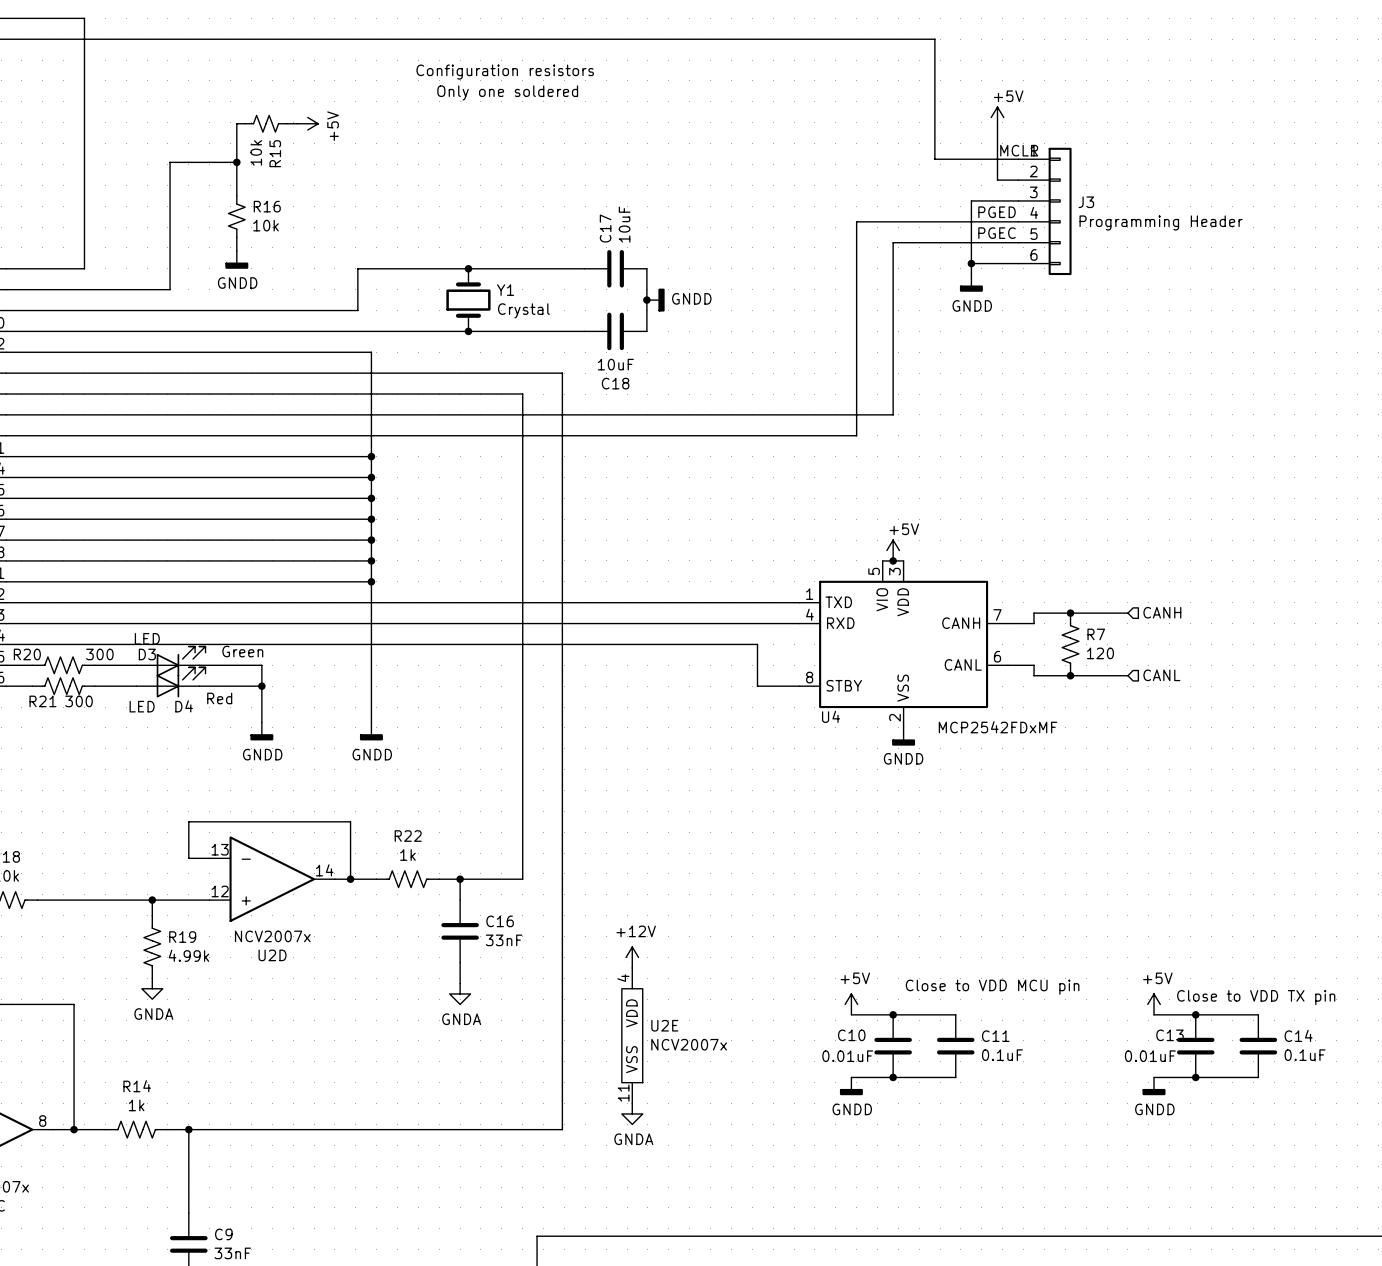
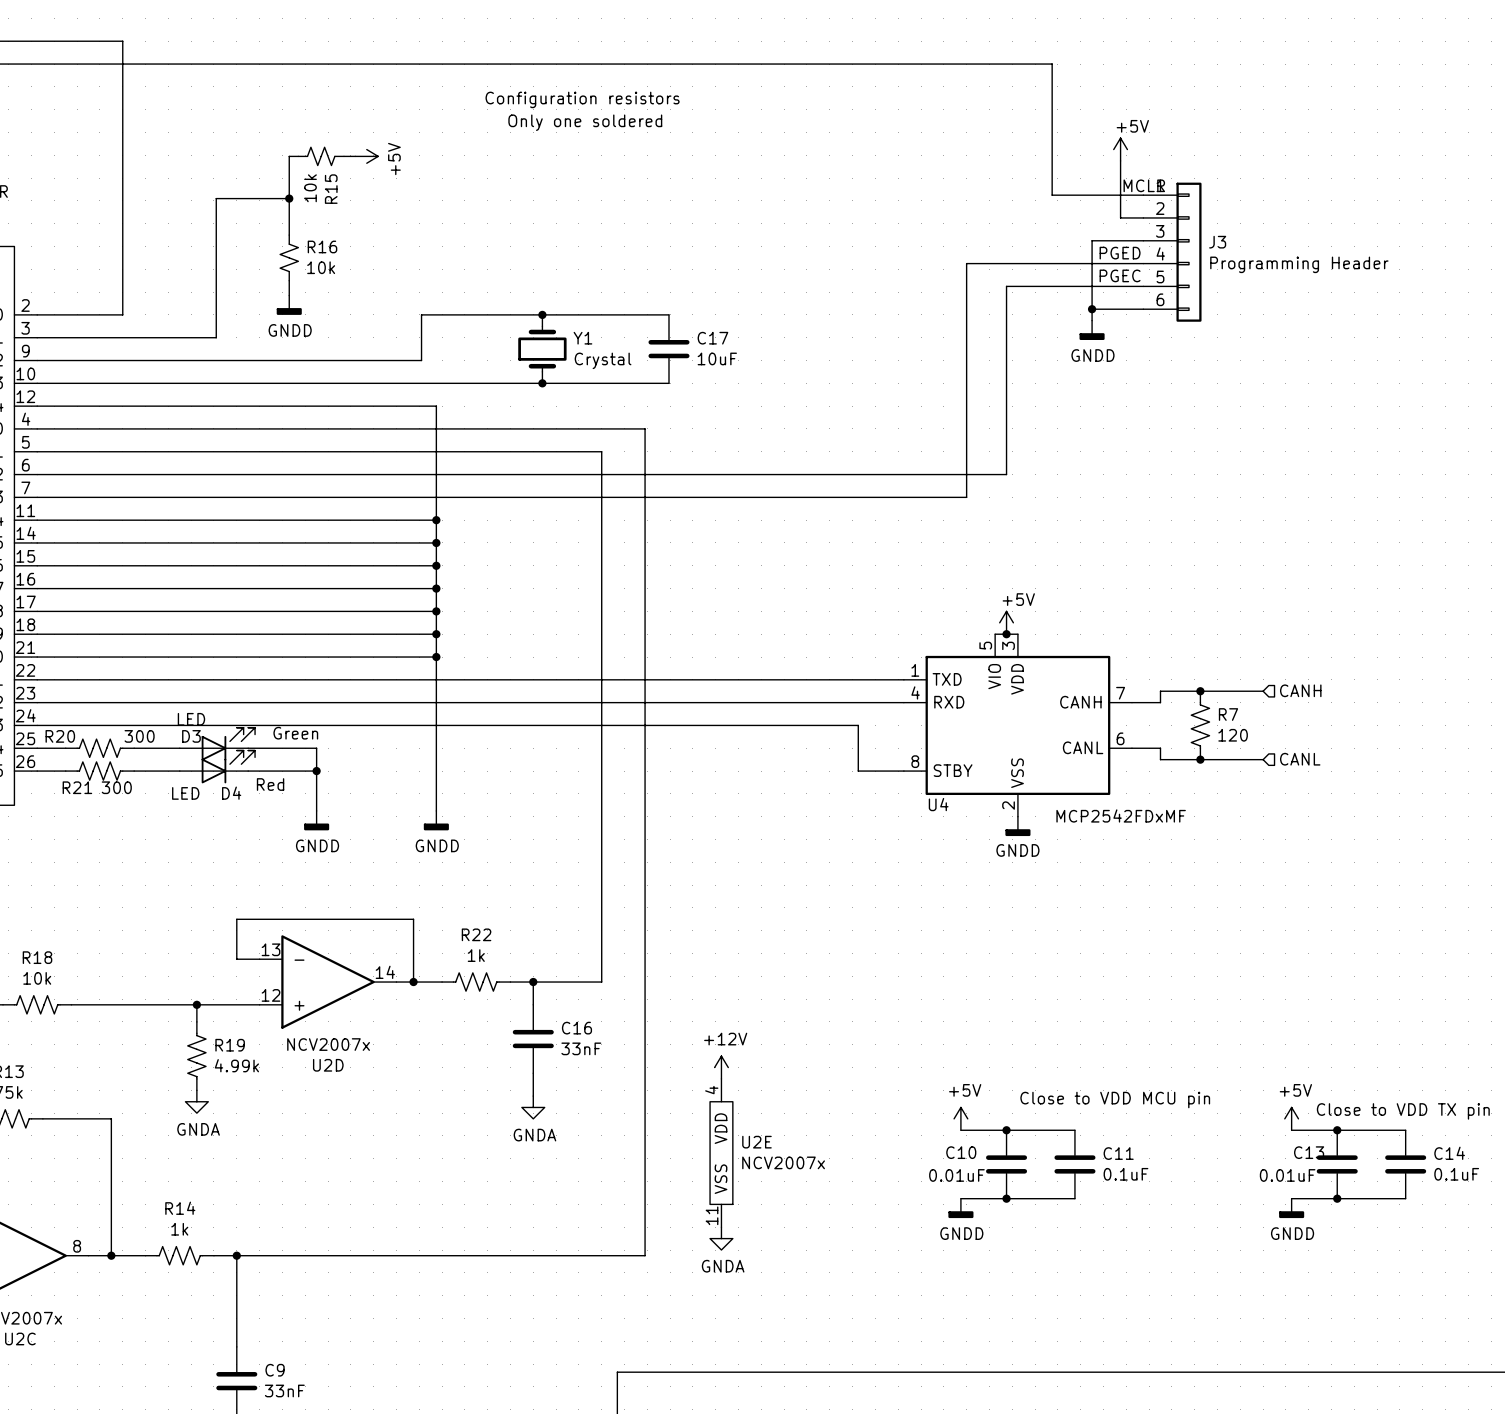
C17 rotation: 0° (615, 268) -> 90° clockwise (668, 349)
C17 position: (615, 268) -> (668, 349)
wire: (646, 268) (646, 331) -> none
junction: (646, 300) -> none
power symbol: GNDD (655, 300) -> none
C18: 10uF (615, 331) -> none

